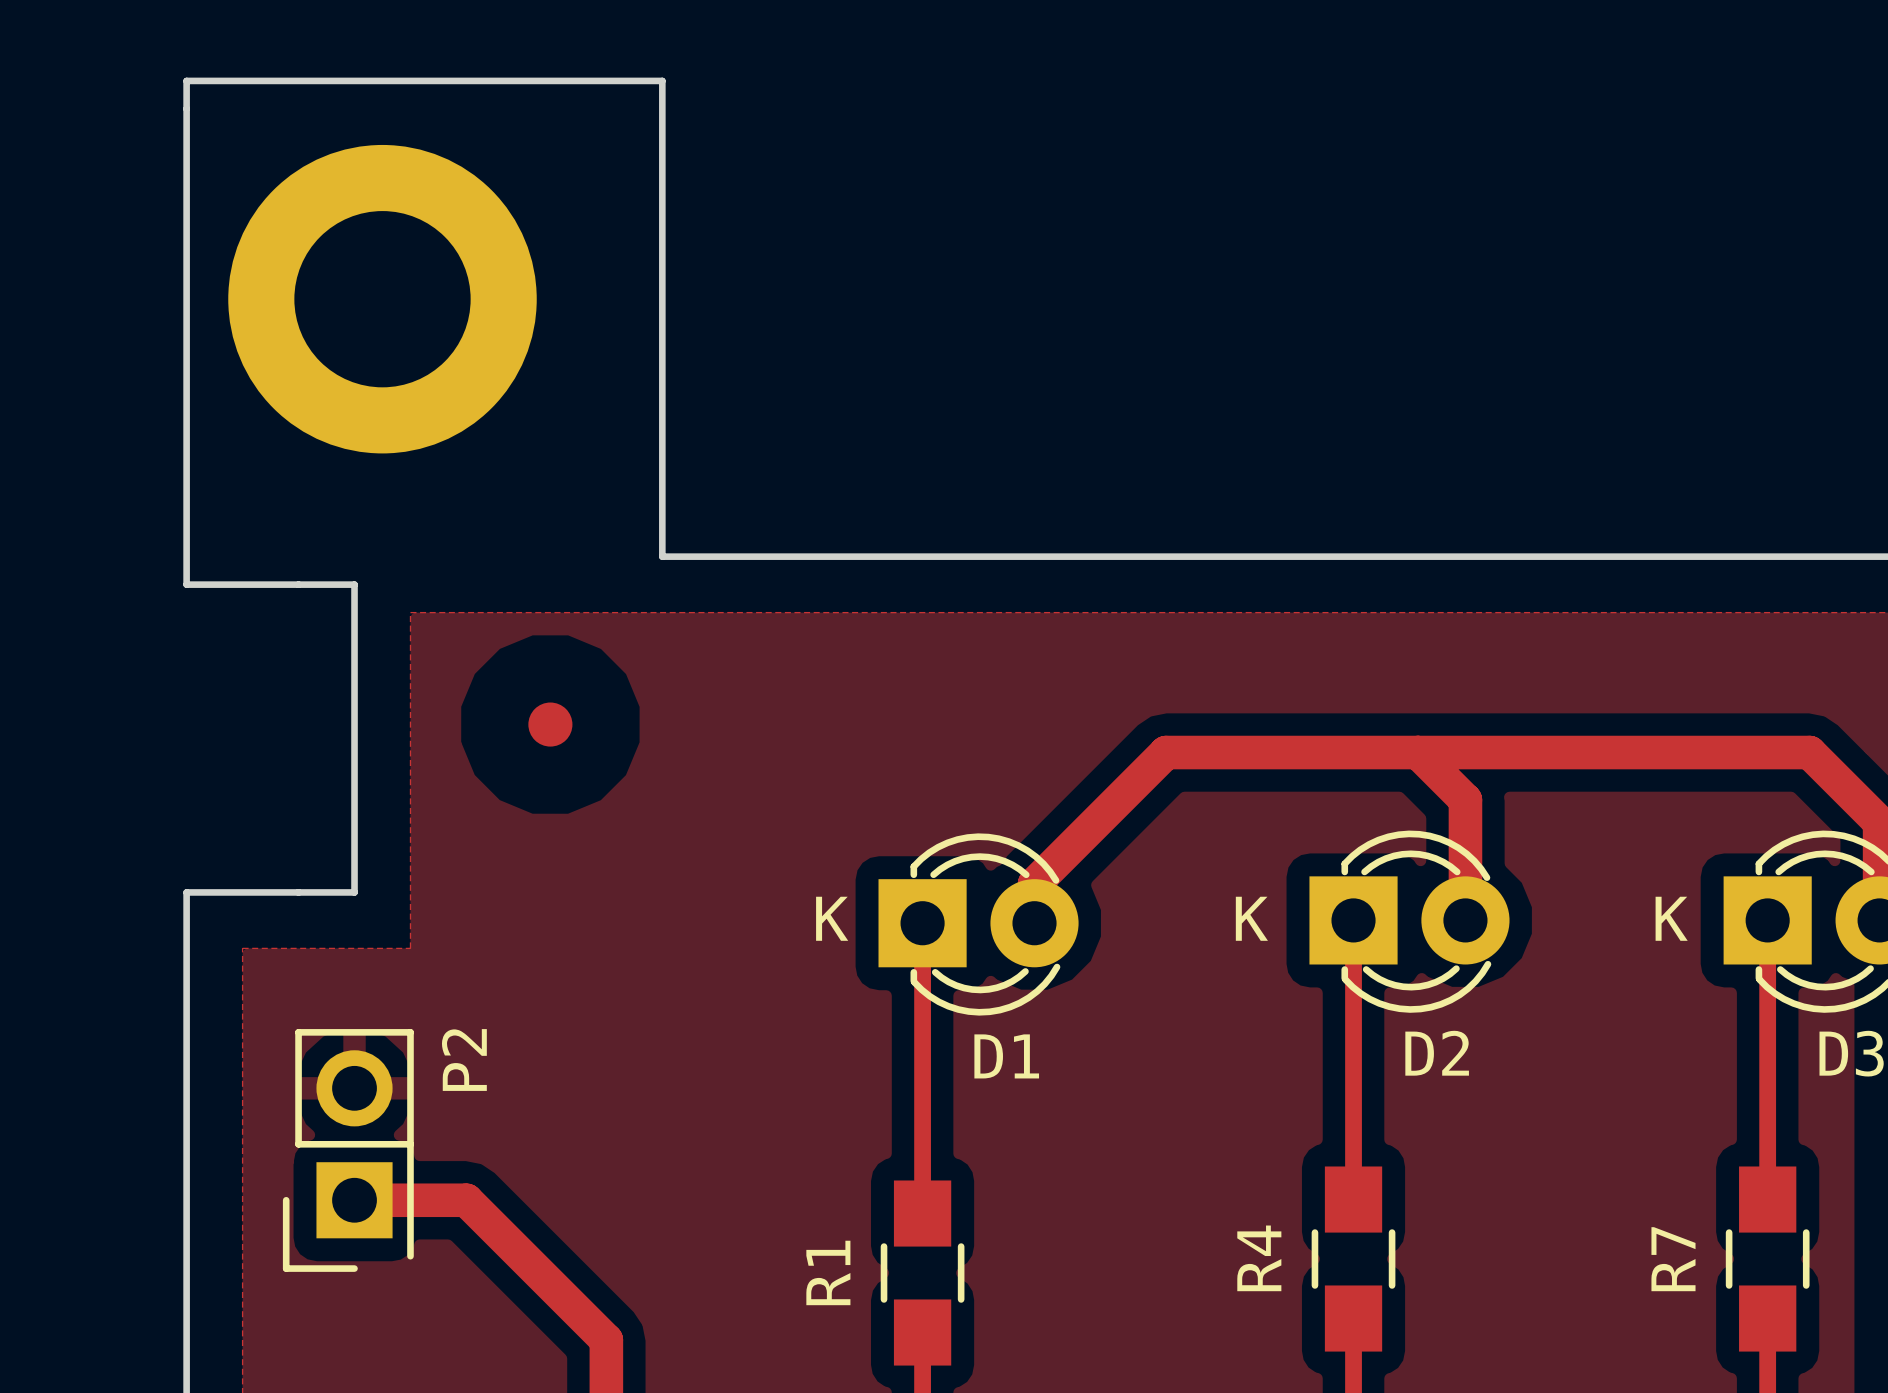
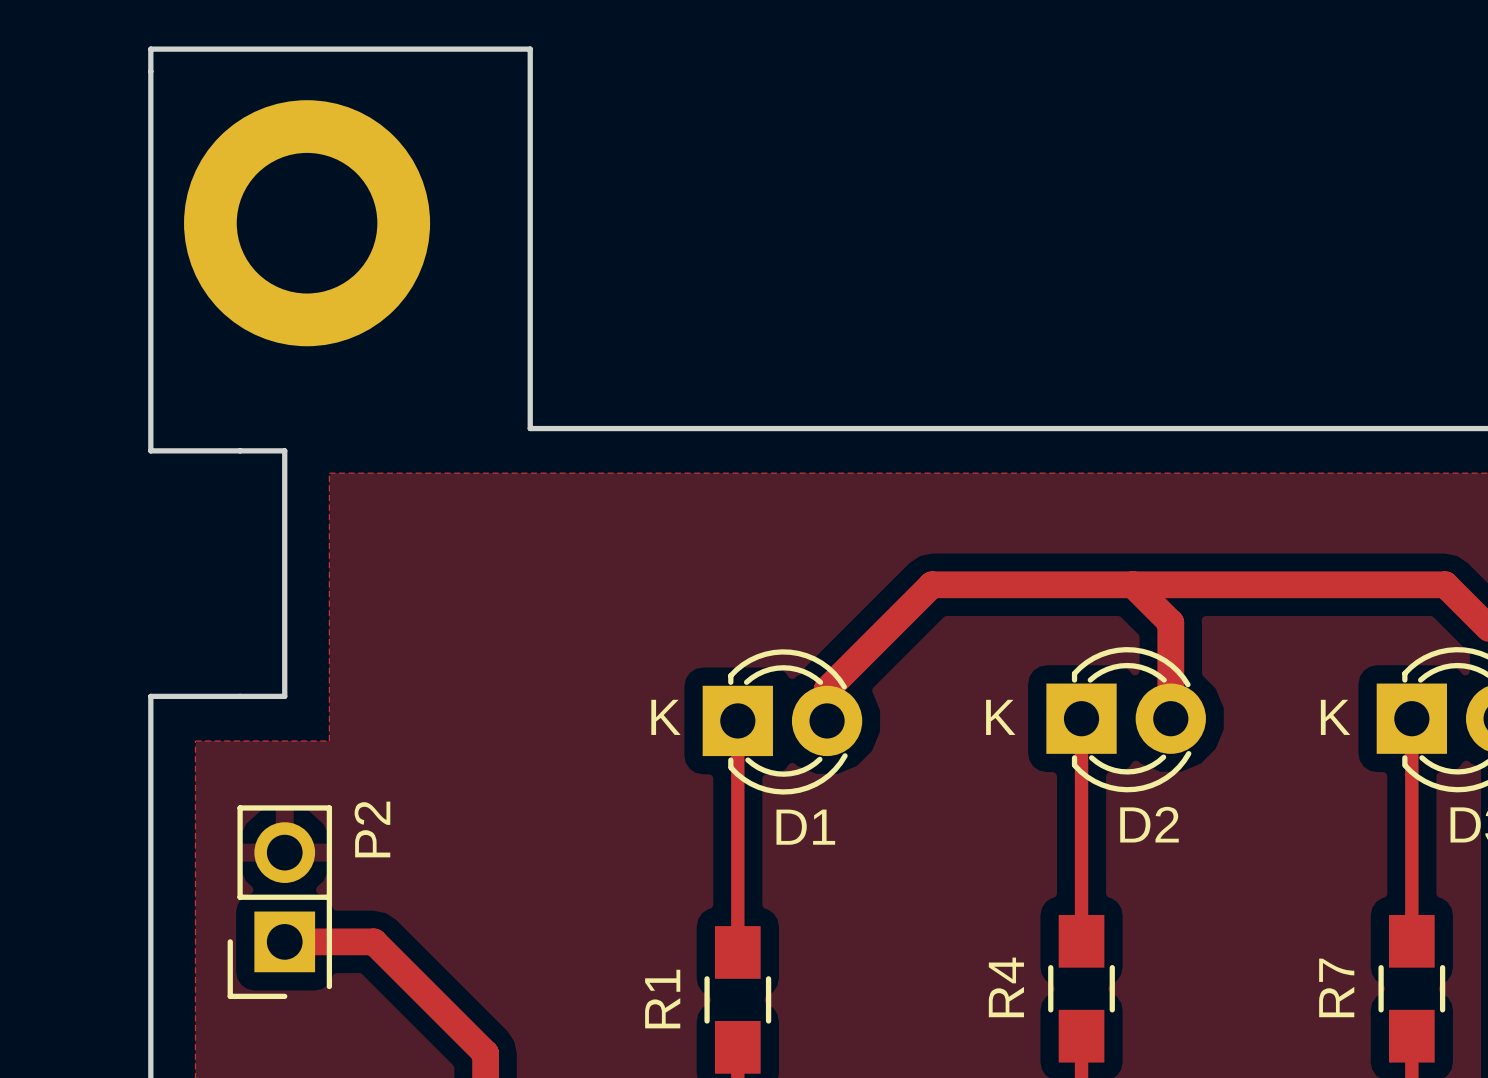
part: (550, 724) -> none

